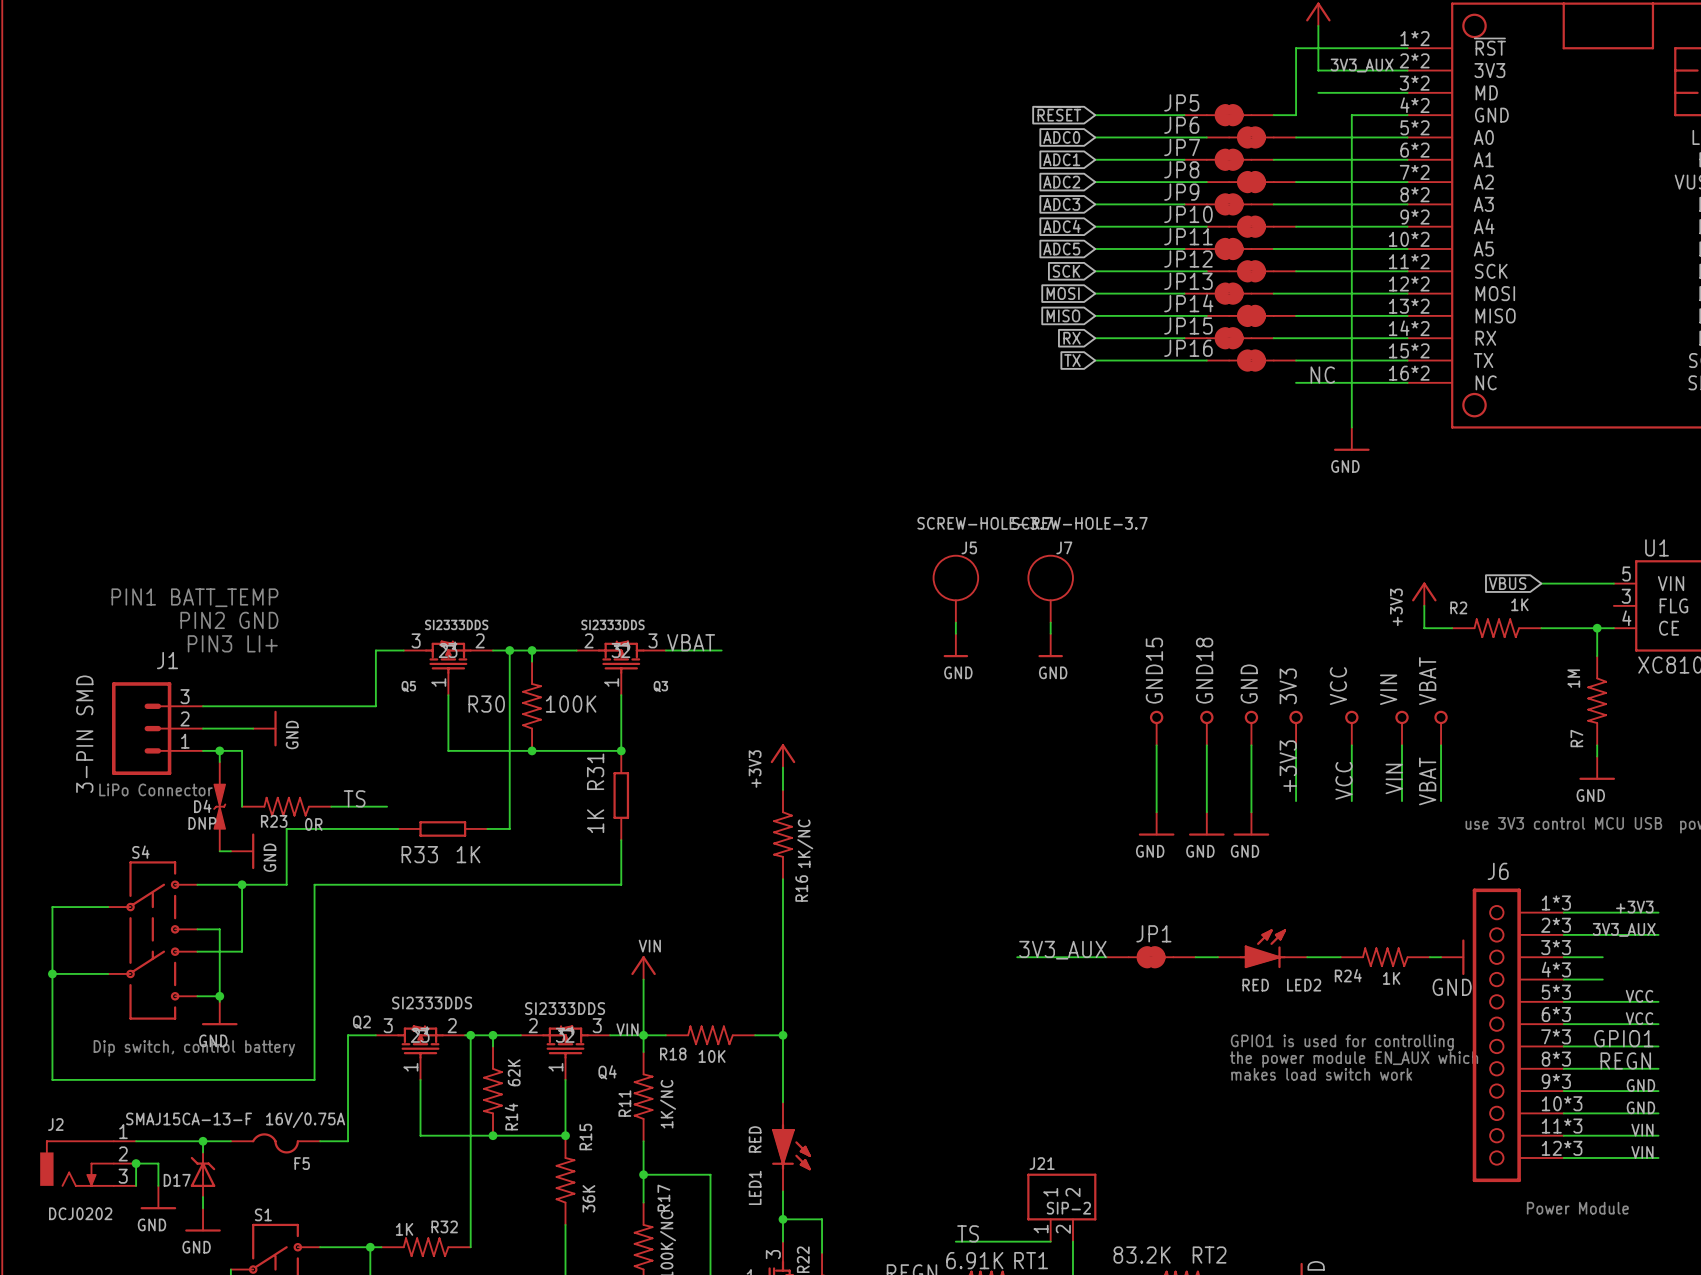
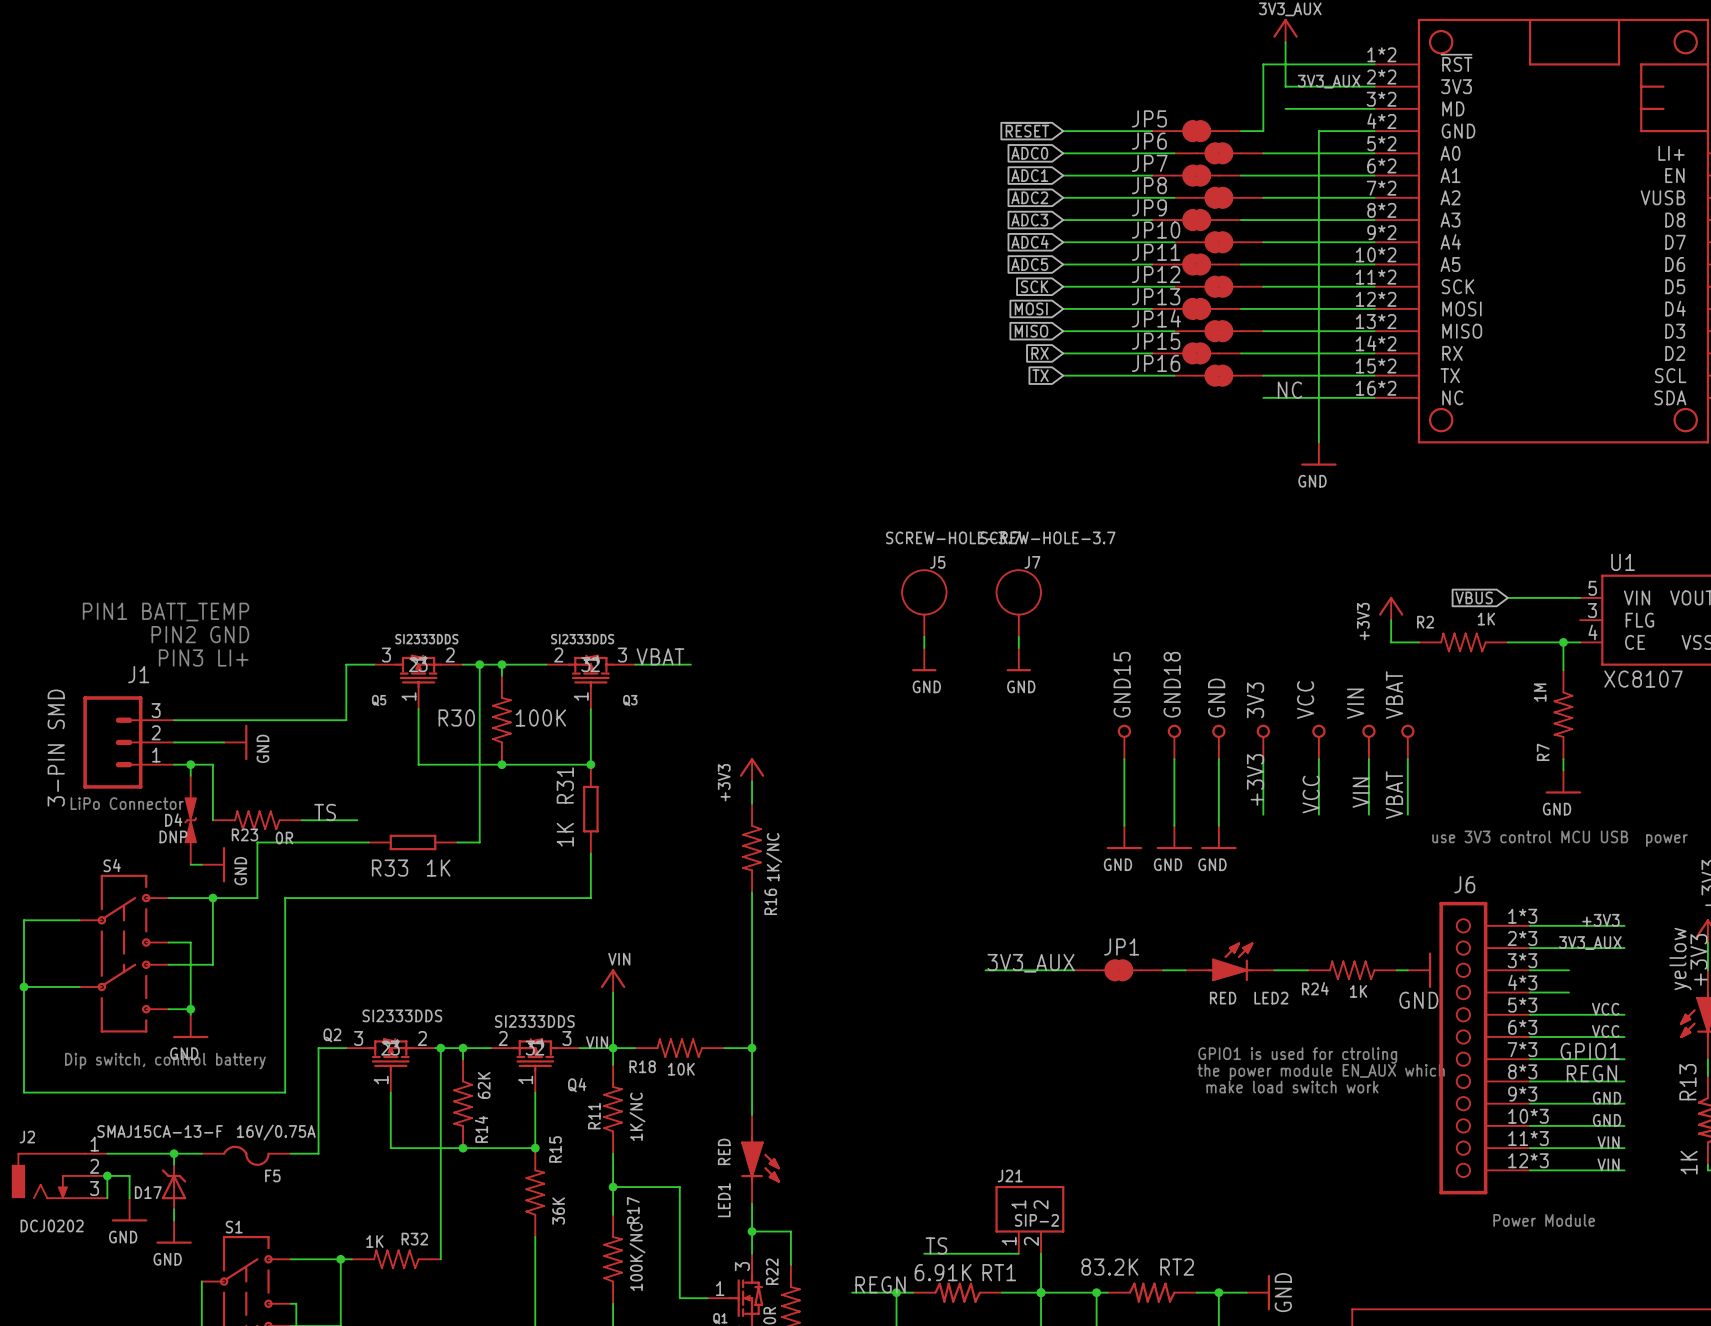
text: GPIO1 is used for controlling (1342, 1042) -> GPIO1 is used for ctroling (1297, 1055)
text: makes load switch work (1321, 1074) -> make load switch work (1292, 1087)

